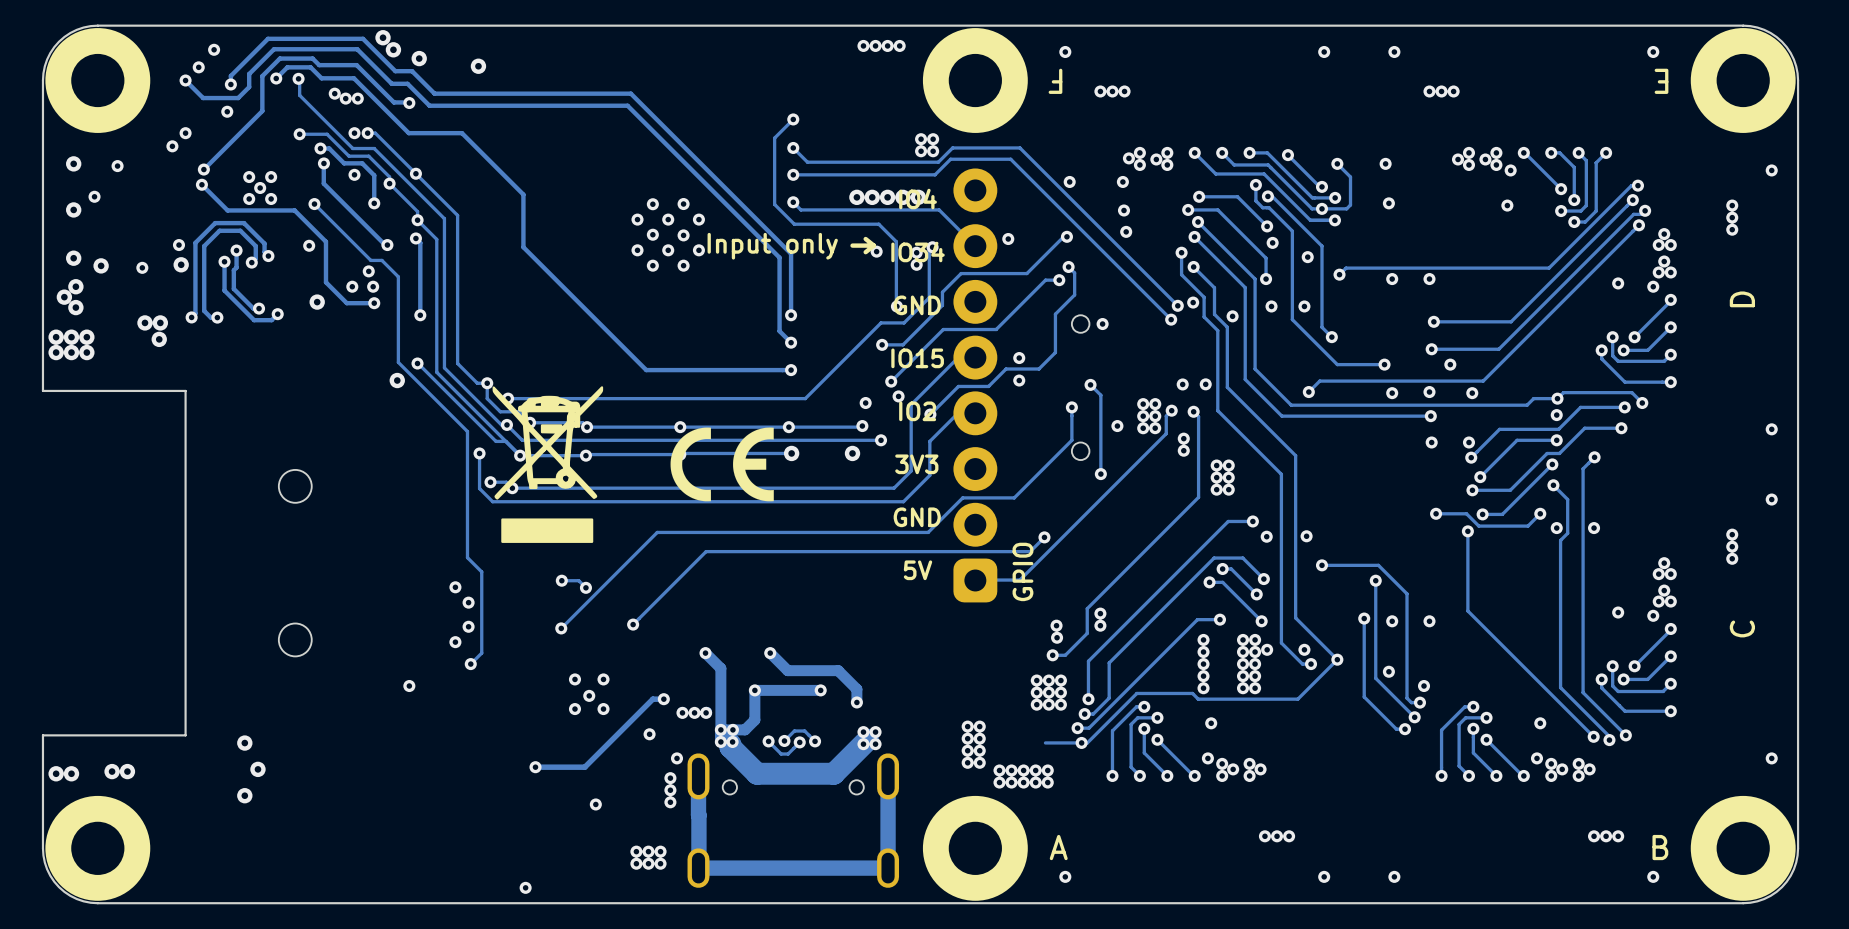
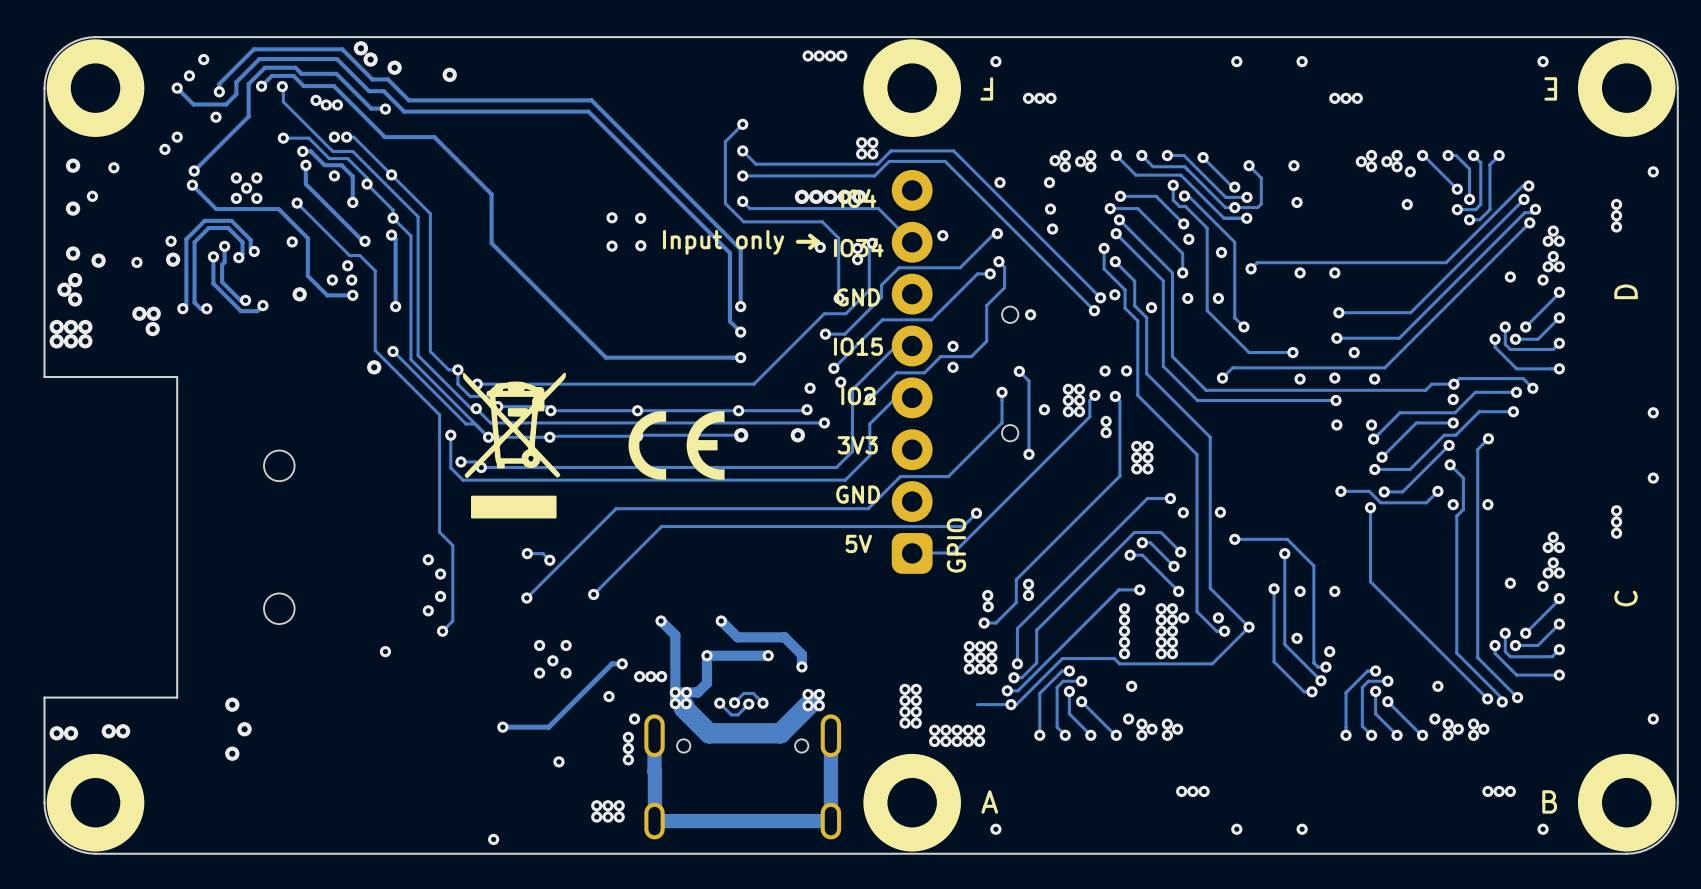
via: (652, 204) -> none
via: (683, 204) -> none
via: (637, 219) -> none
via: none -> (612, 217)
via: (668, 219) -> none
via: (698, 219) -> none
via: none -> (640, 218)
via: (652, 234) -> none
via: (683, 235) -> none
via: none -> (640, 245)
via: (637, 250) -> none
via: none -> (612, 246)
via: (668, 250) -> none
via: (698, 250) -> none
via: (652, 265) -> none
via: (683, 265) -> none

